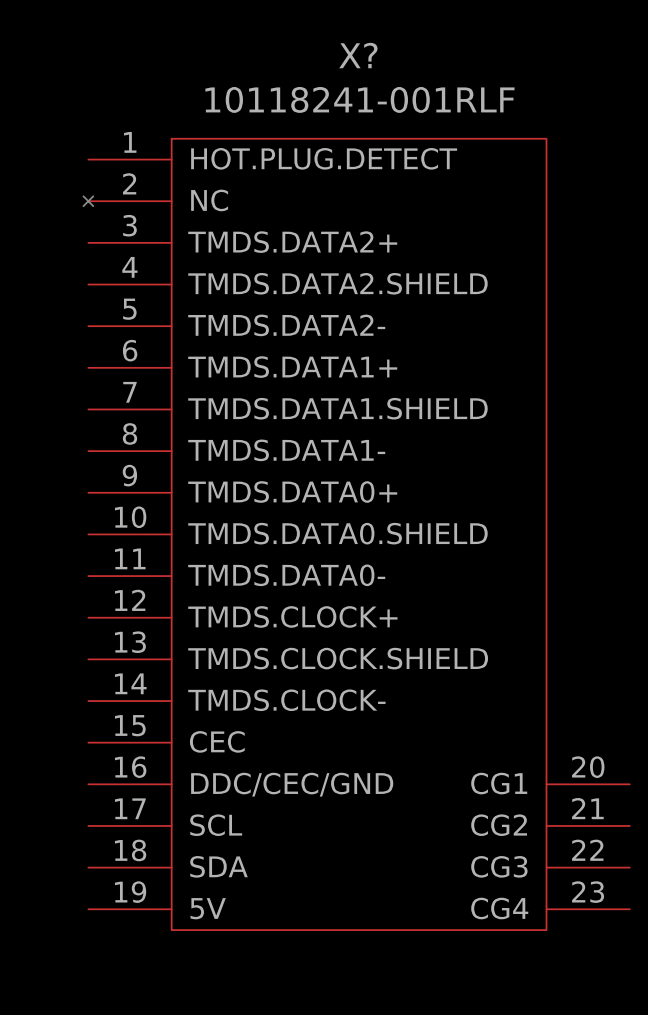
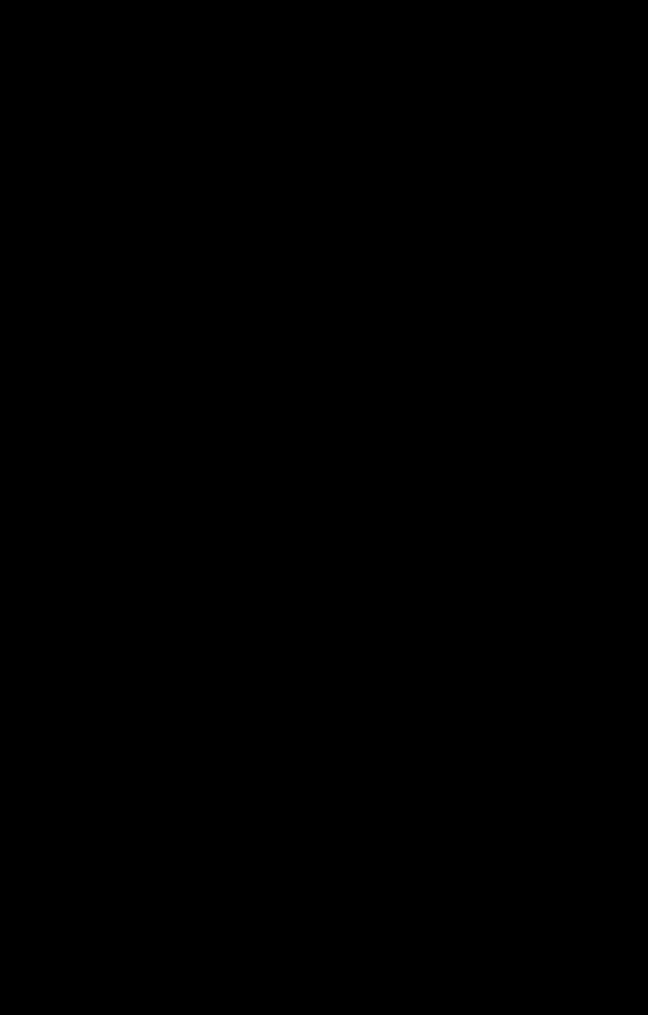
X?: 10118241-001RLF (356, 534) -> none

